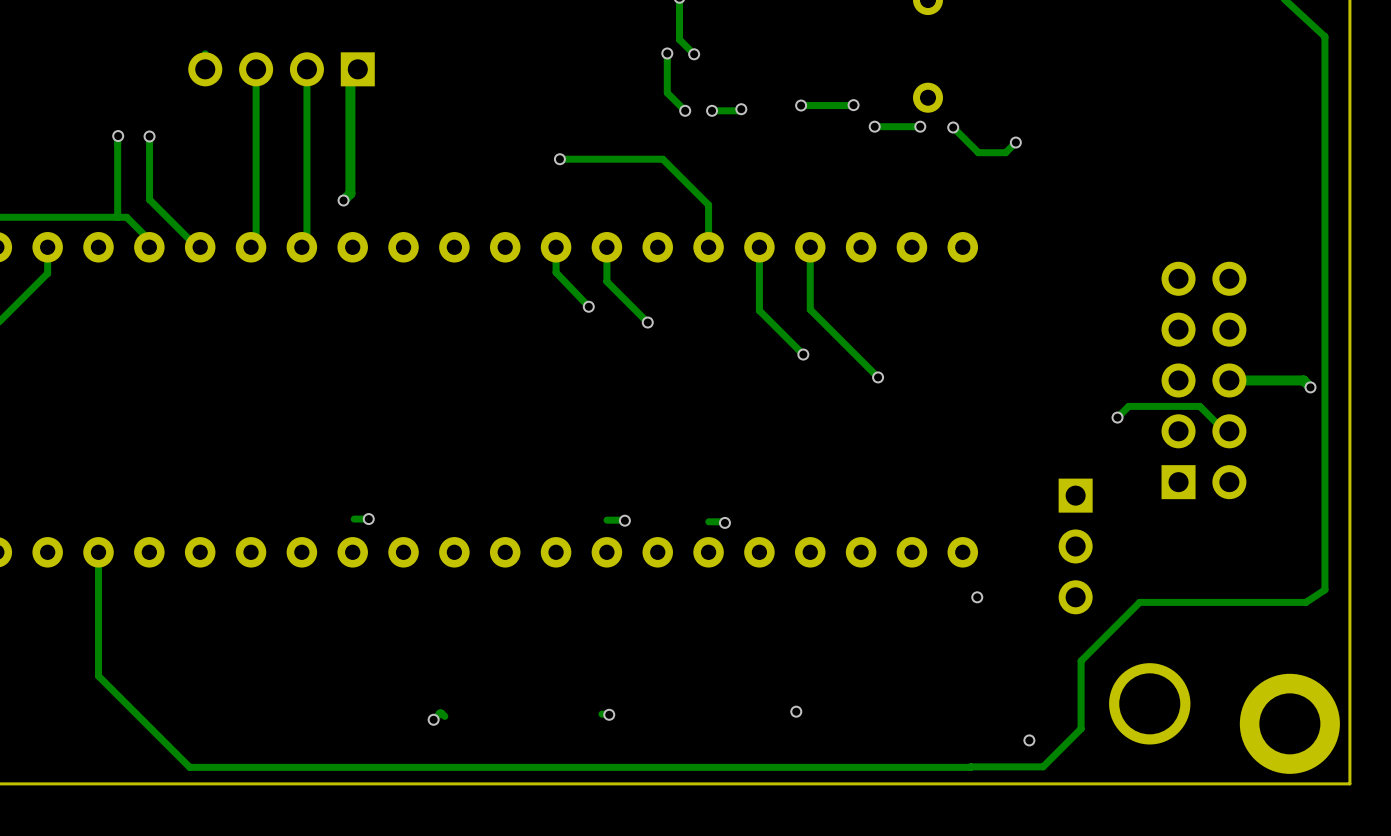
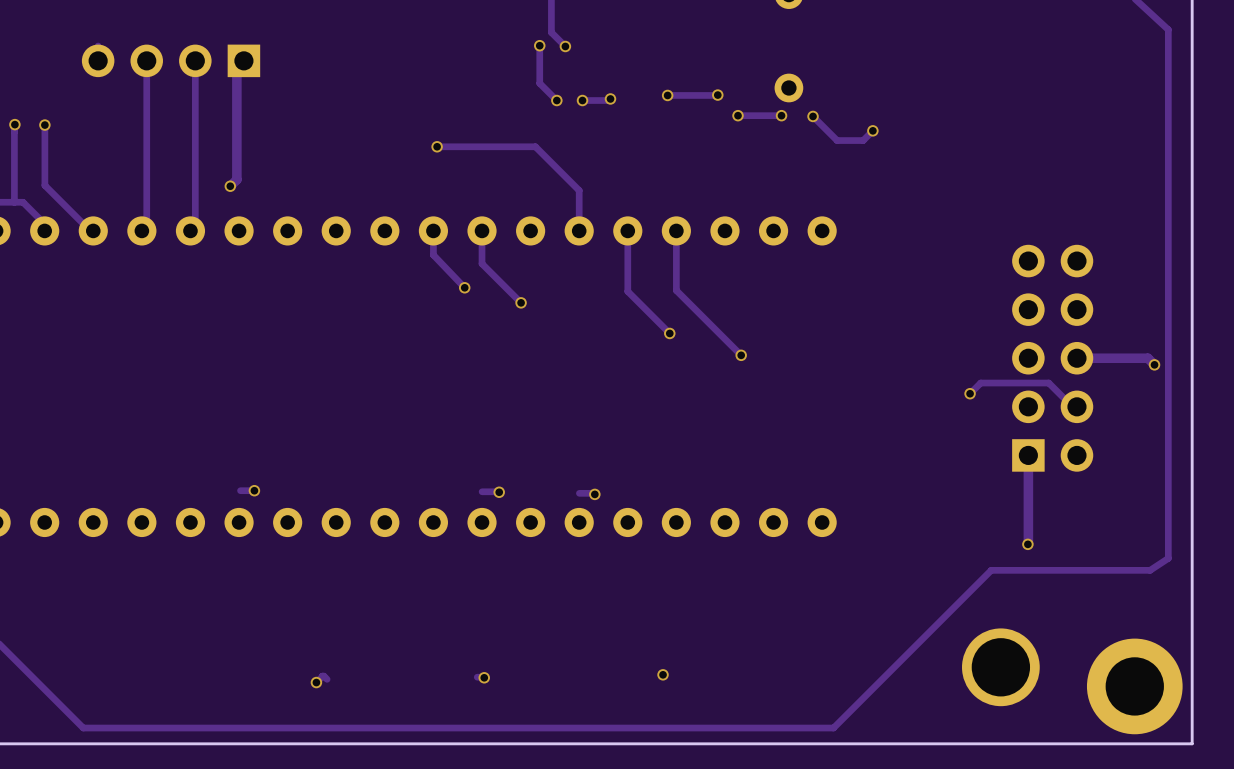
track: none -> (1028, 455) (1027, 544)
part: (1075, 546) -> none
via: none -> (1027, 544)
via: (977, 597) -> none
track: (1081, 660) (1081, 728) (1043, 766) (970, 767) -> (935, 626) (833, 728) (829, 728)
via: (1029, 740) -> none

